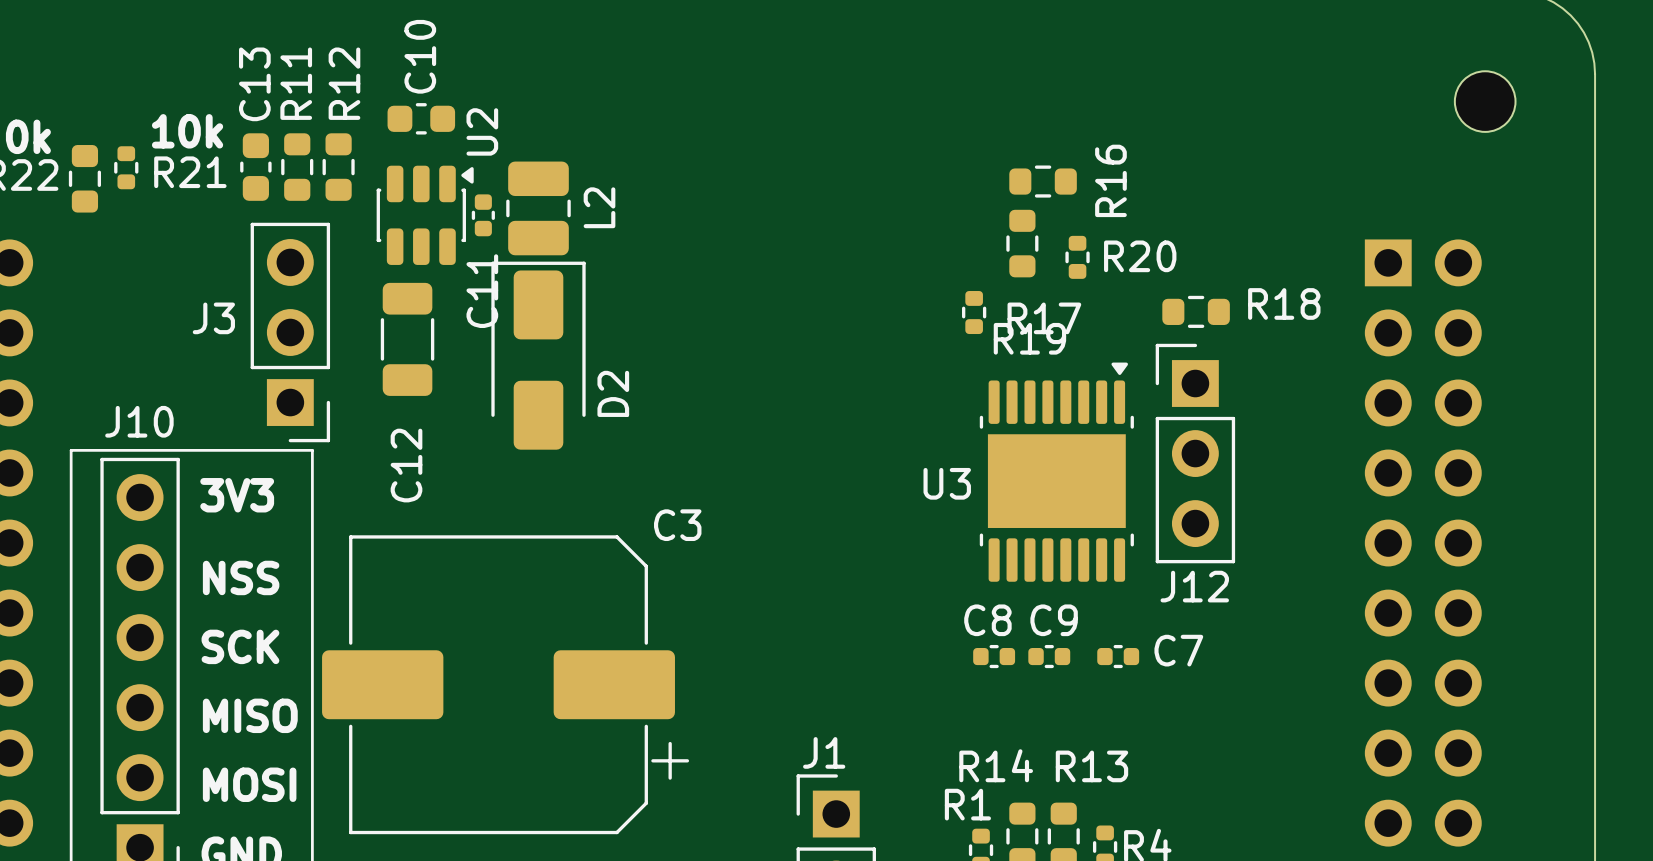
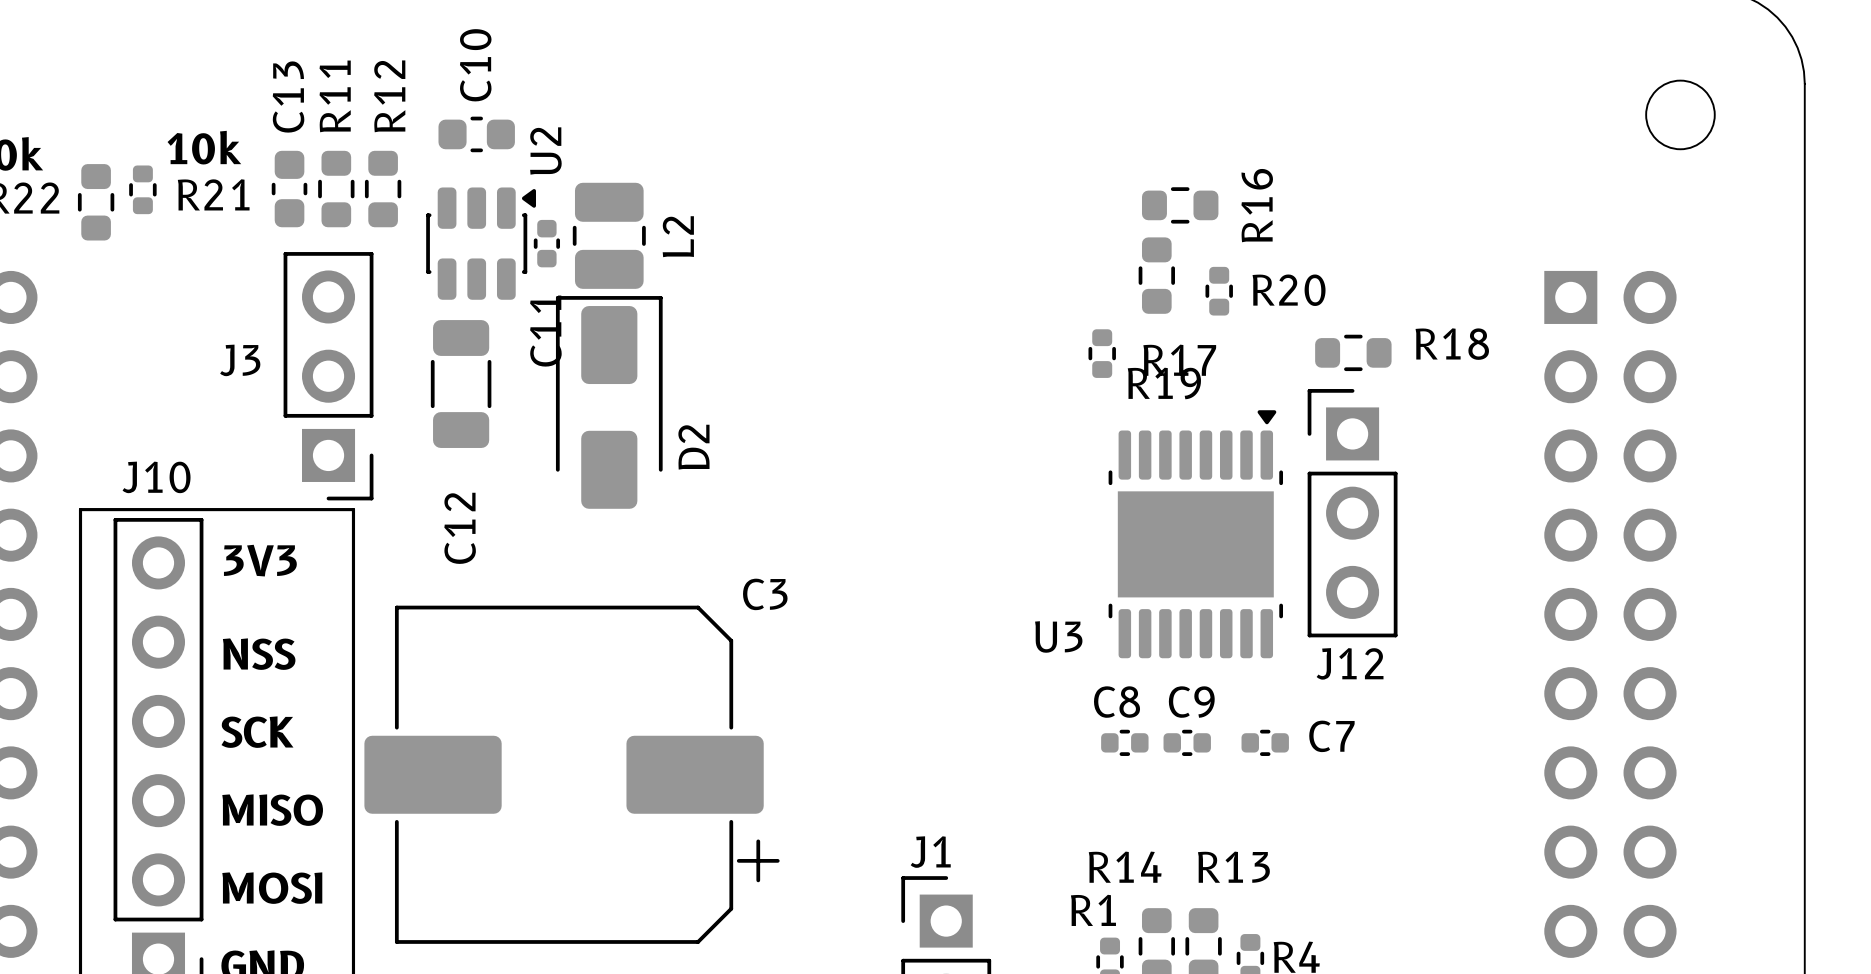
U3 name position: U3 (947, 483) -> U3 (1058, 636)

